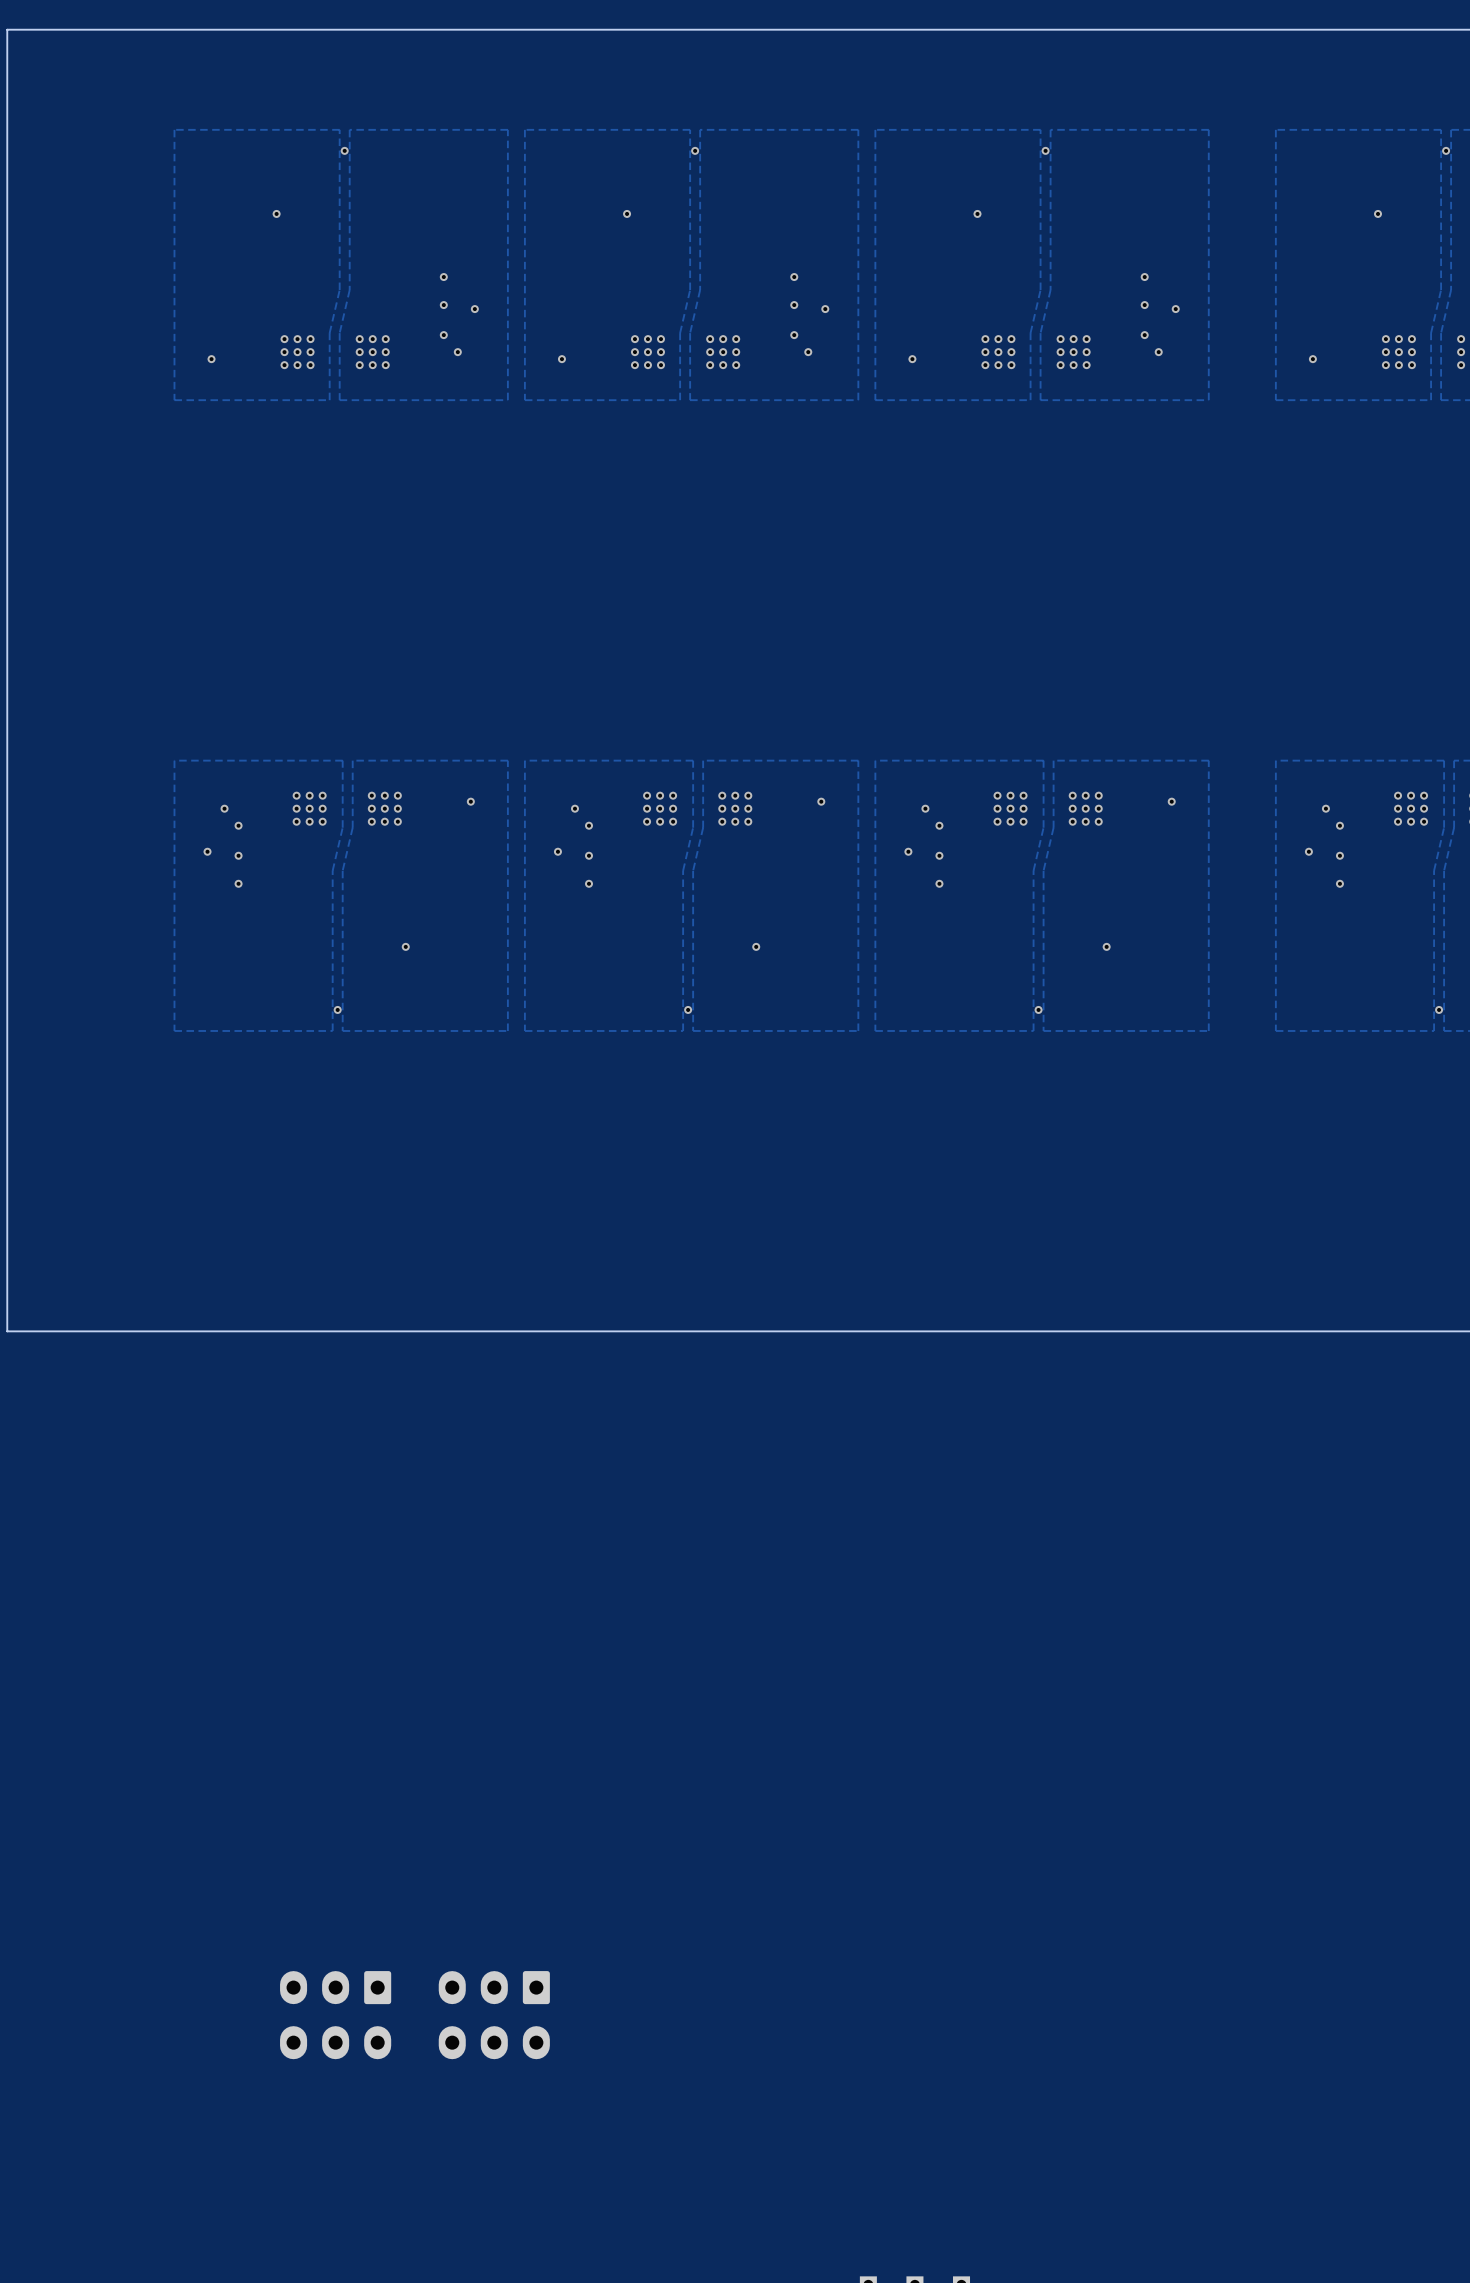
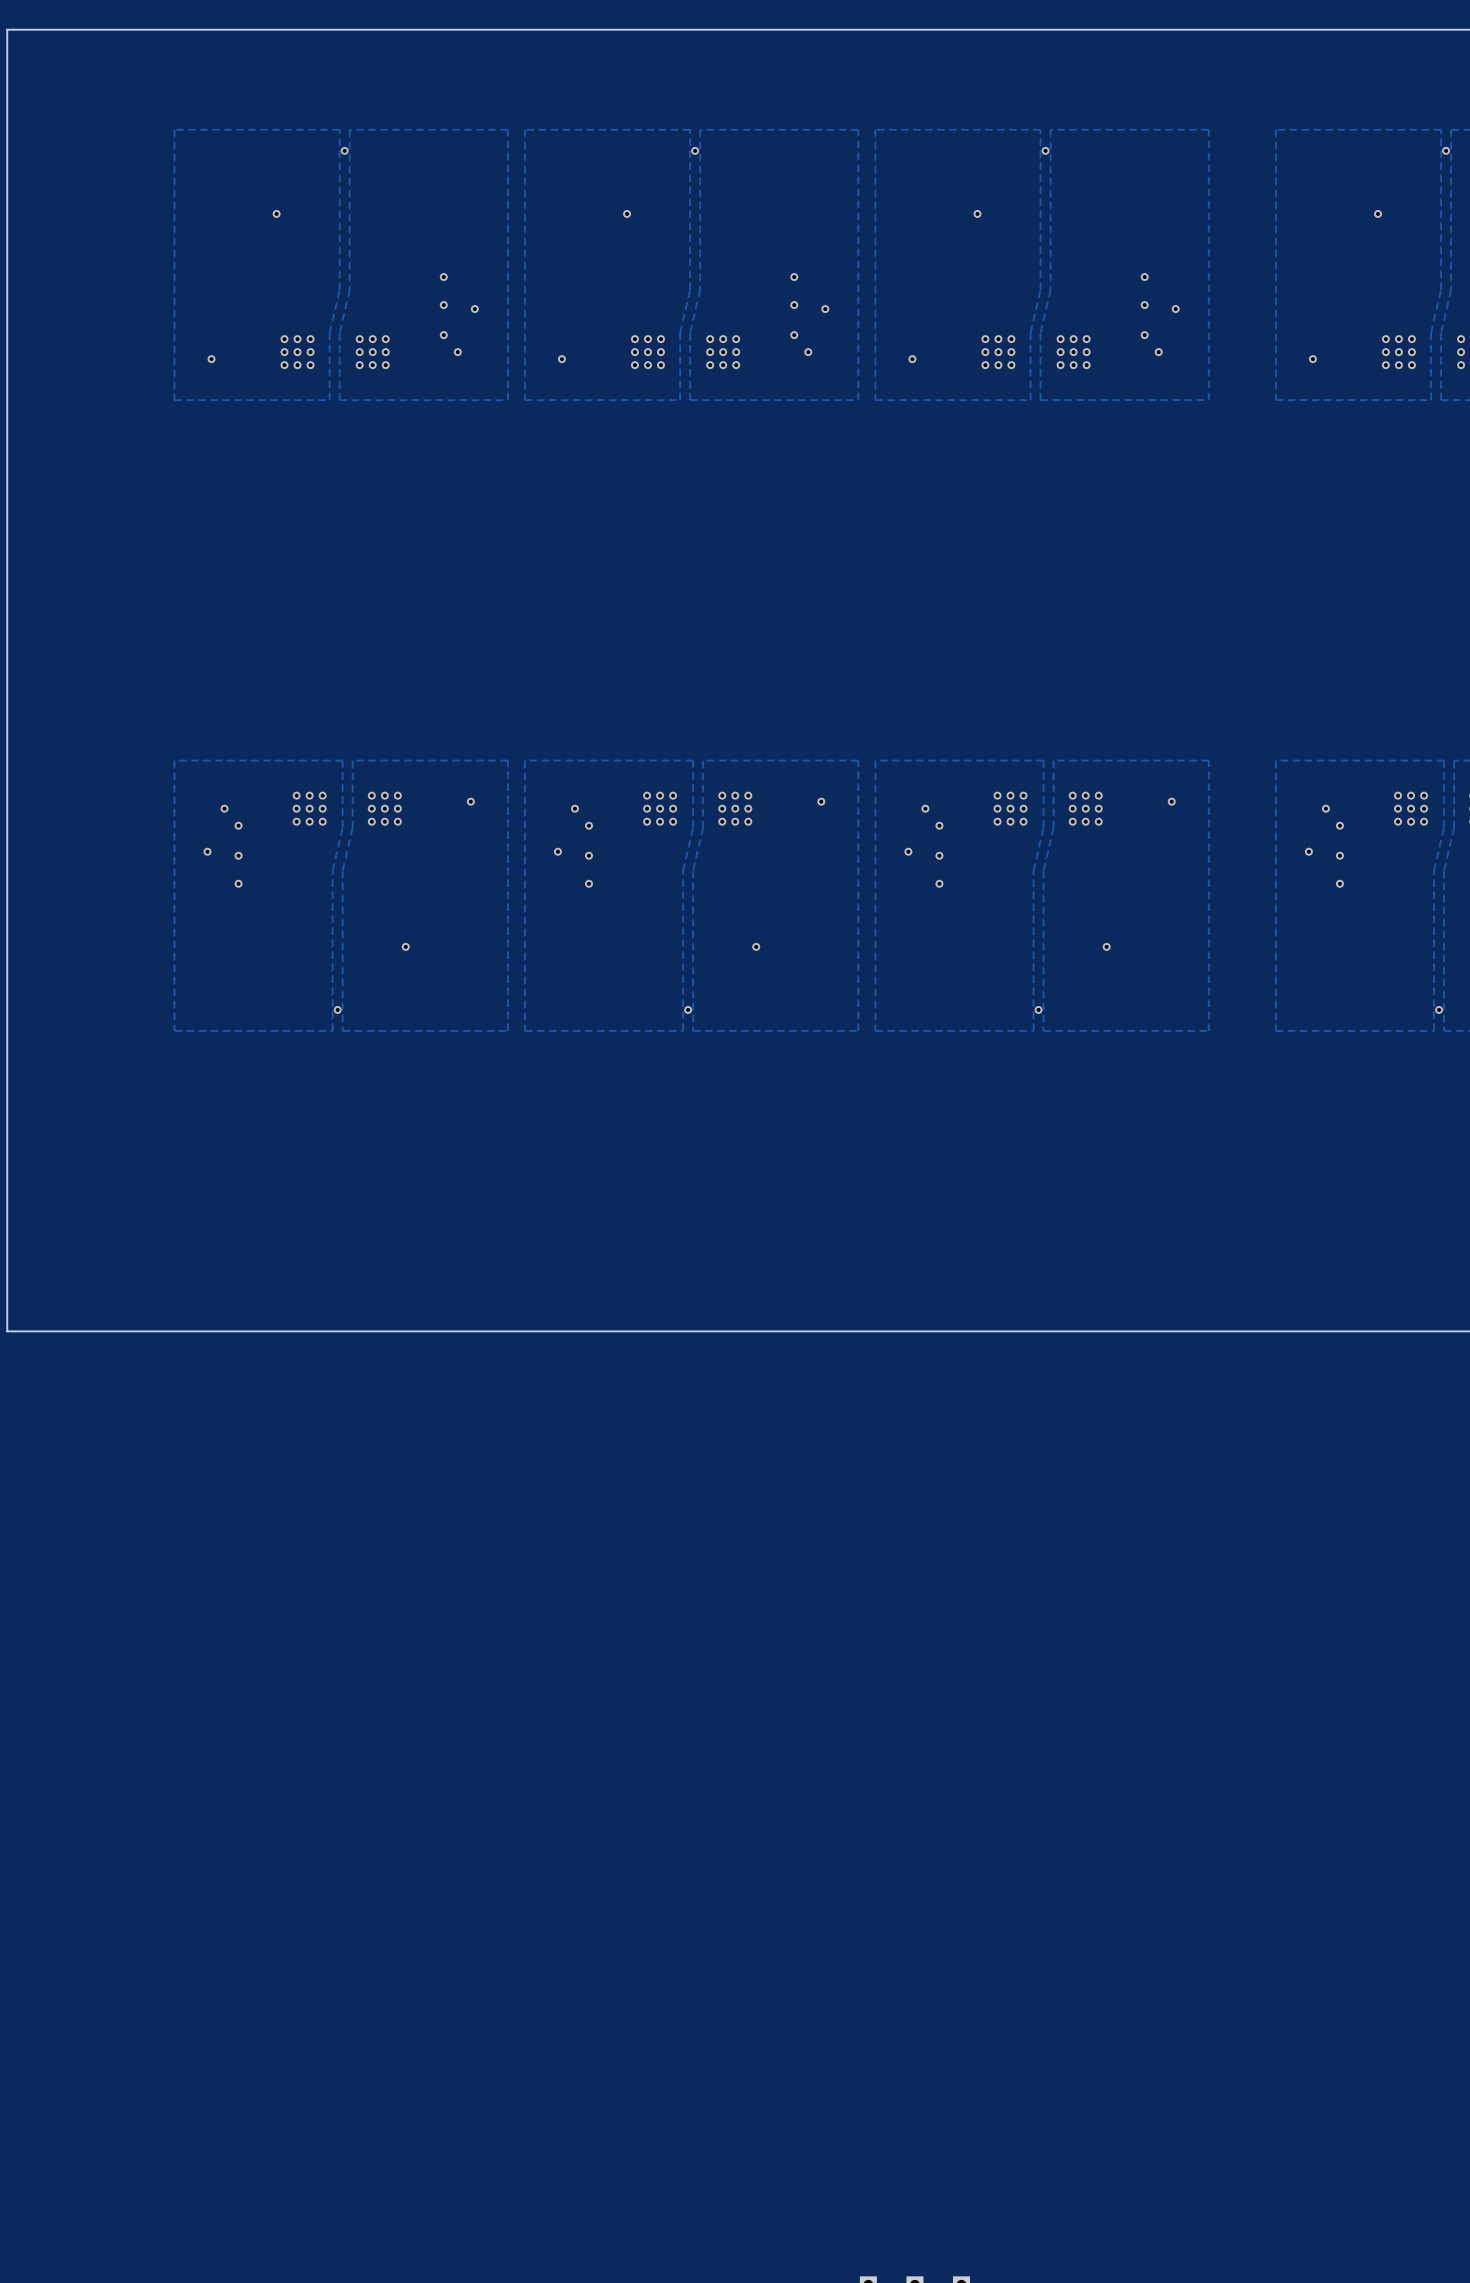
part: (335, 2015) -> none
part: (494, 2015) -> none

